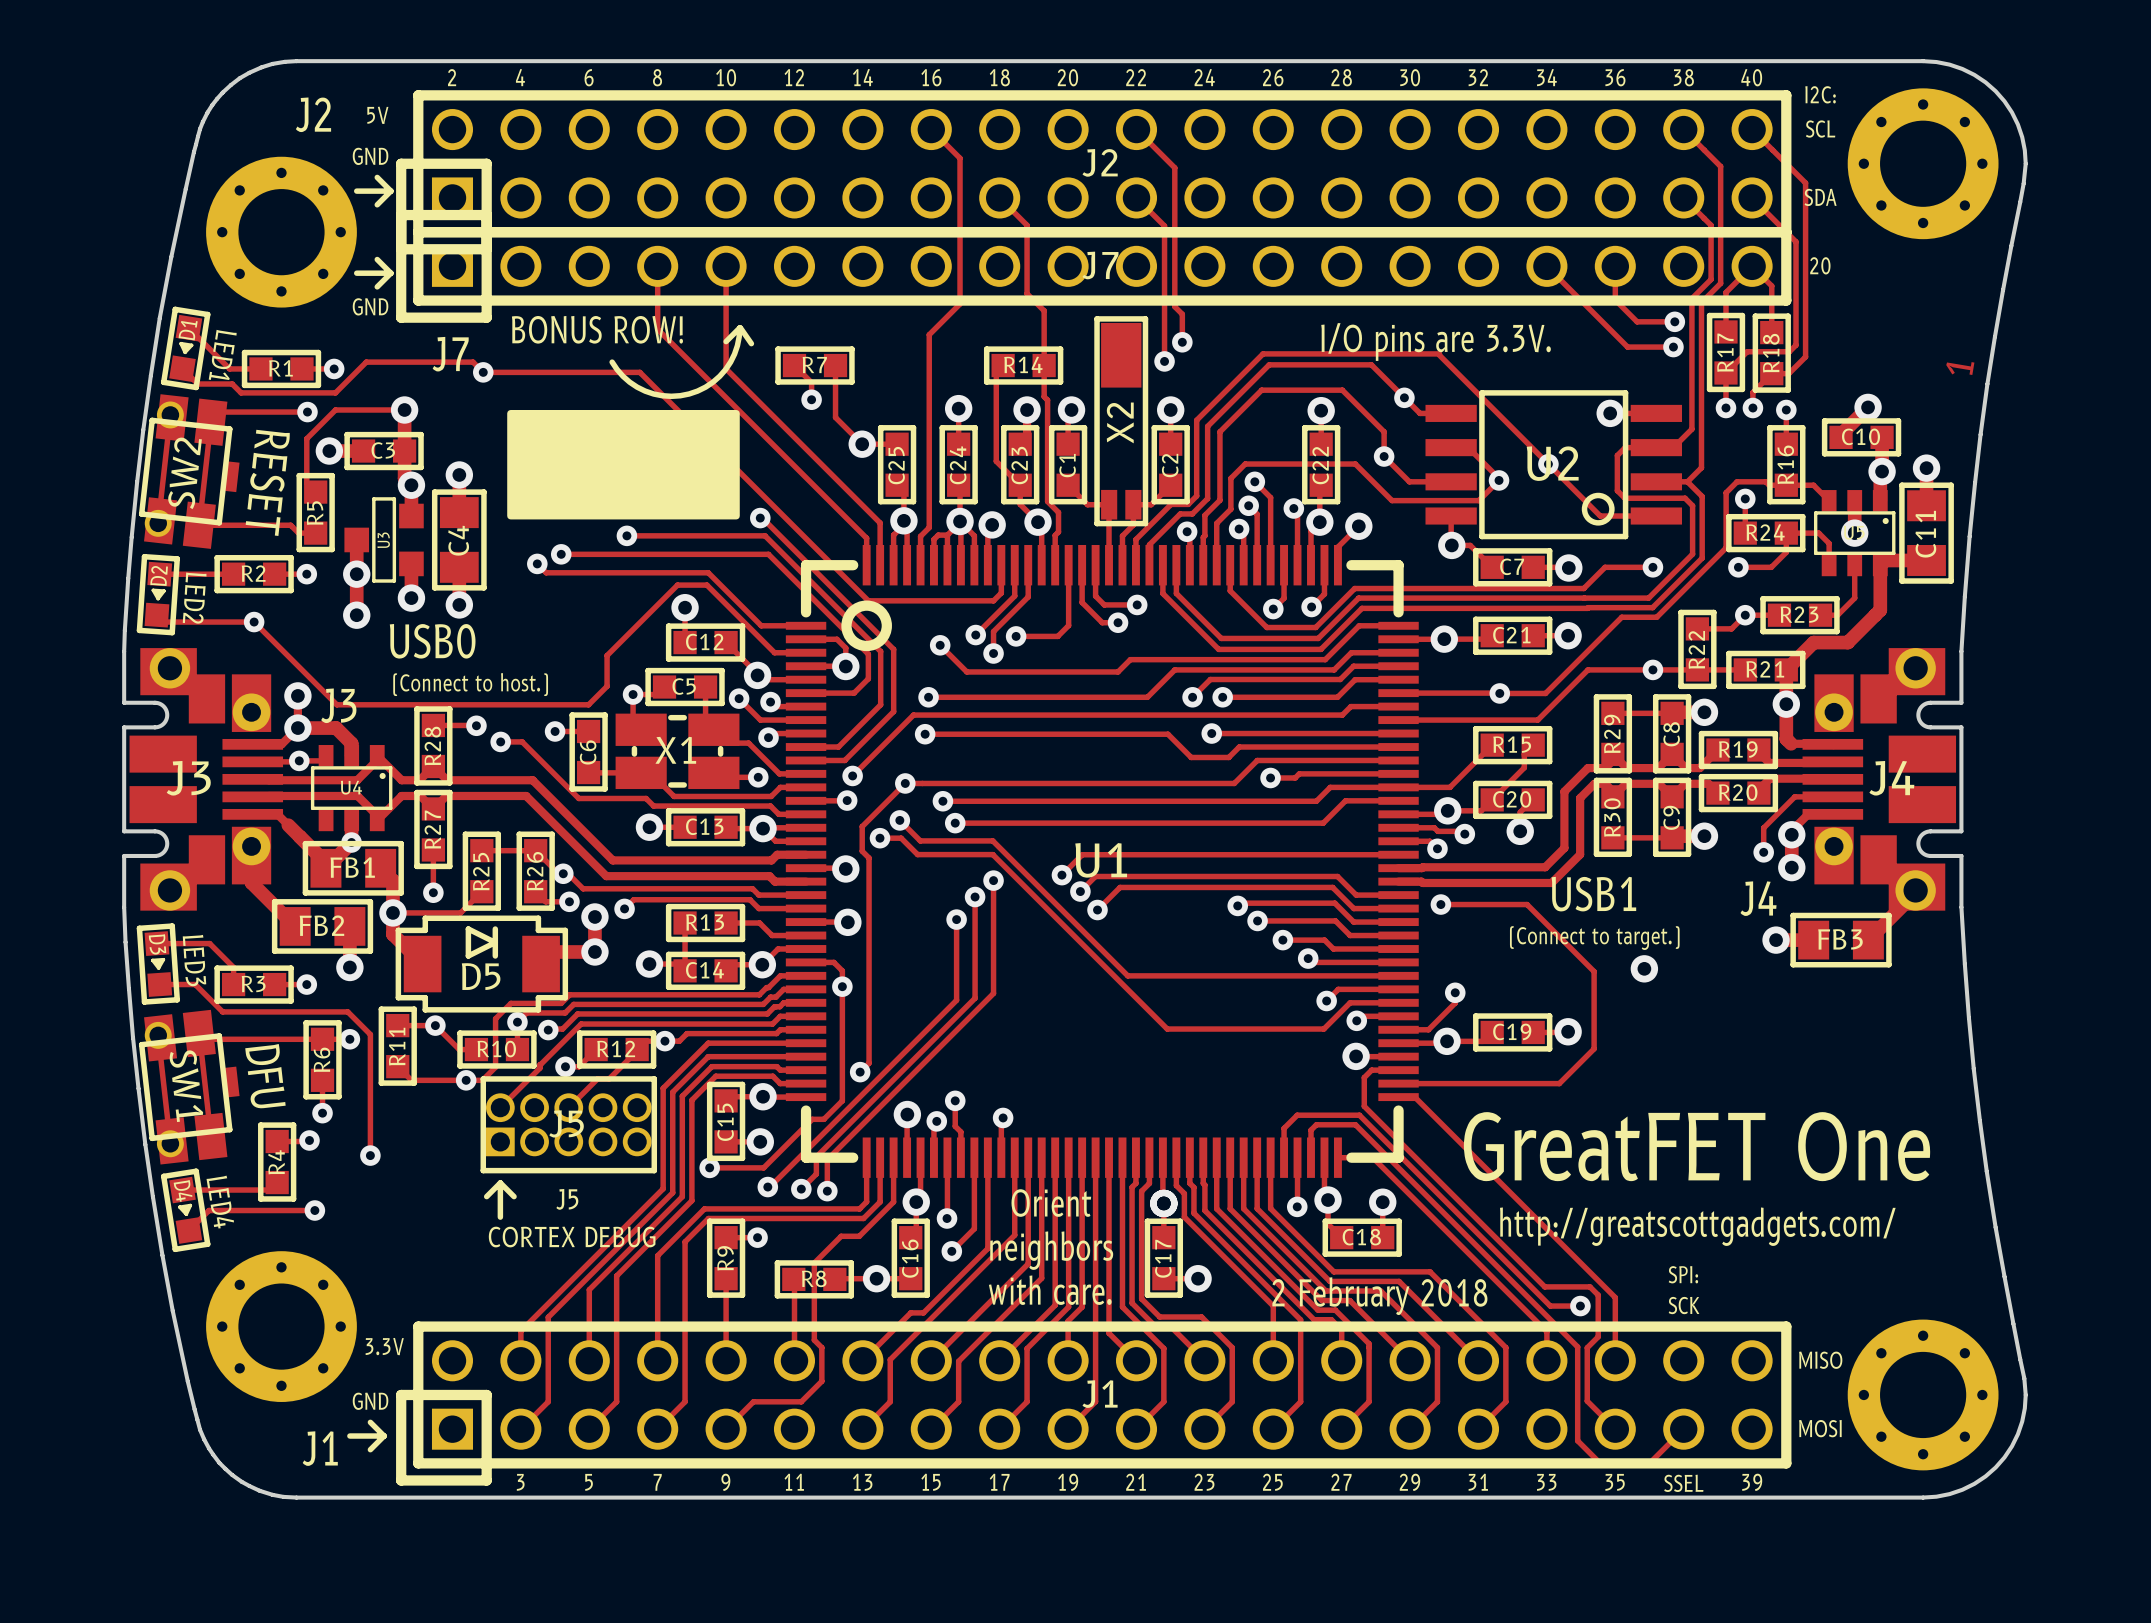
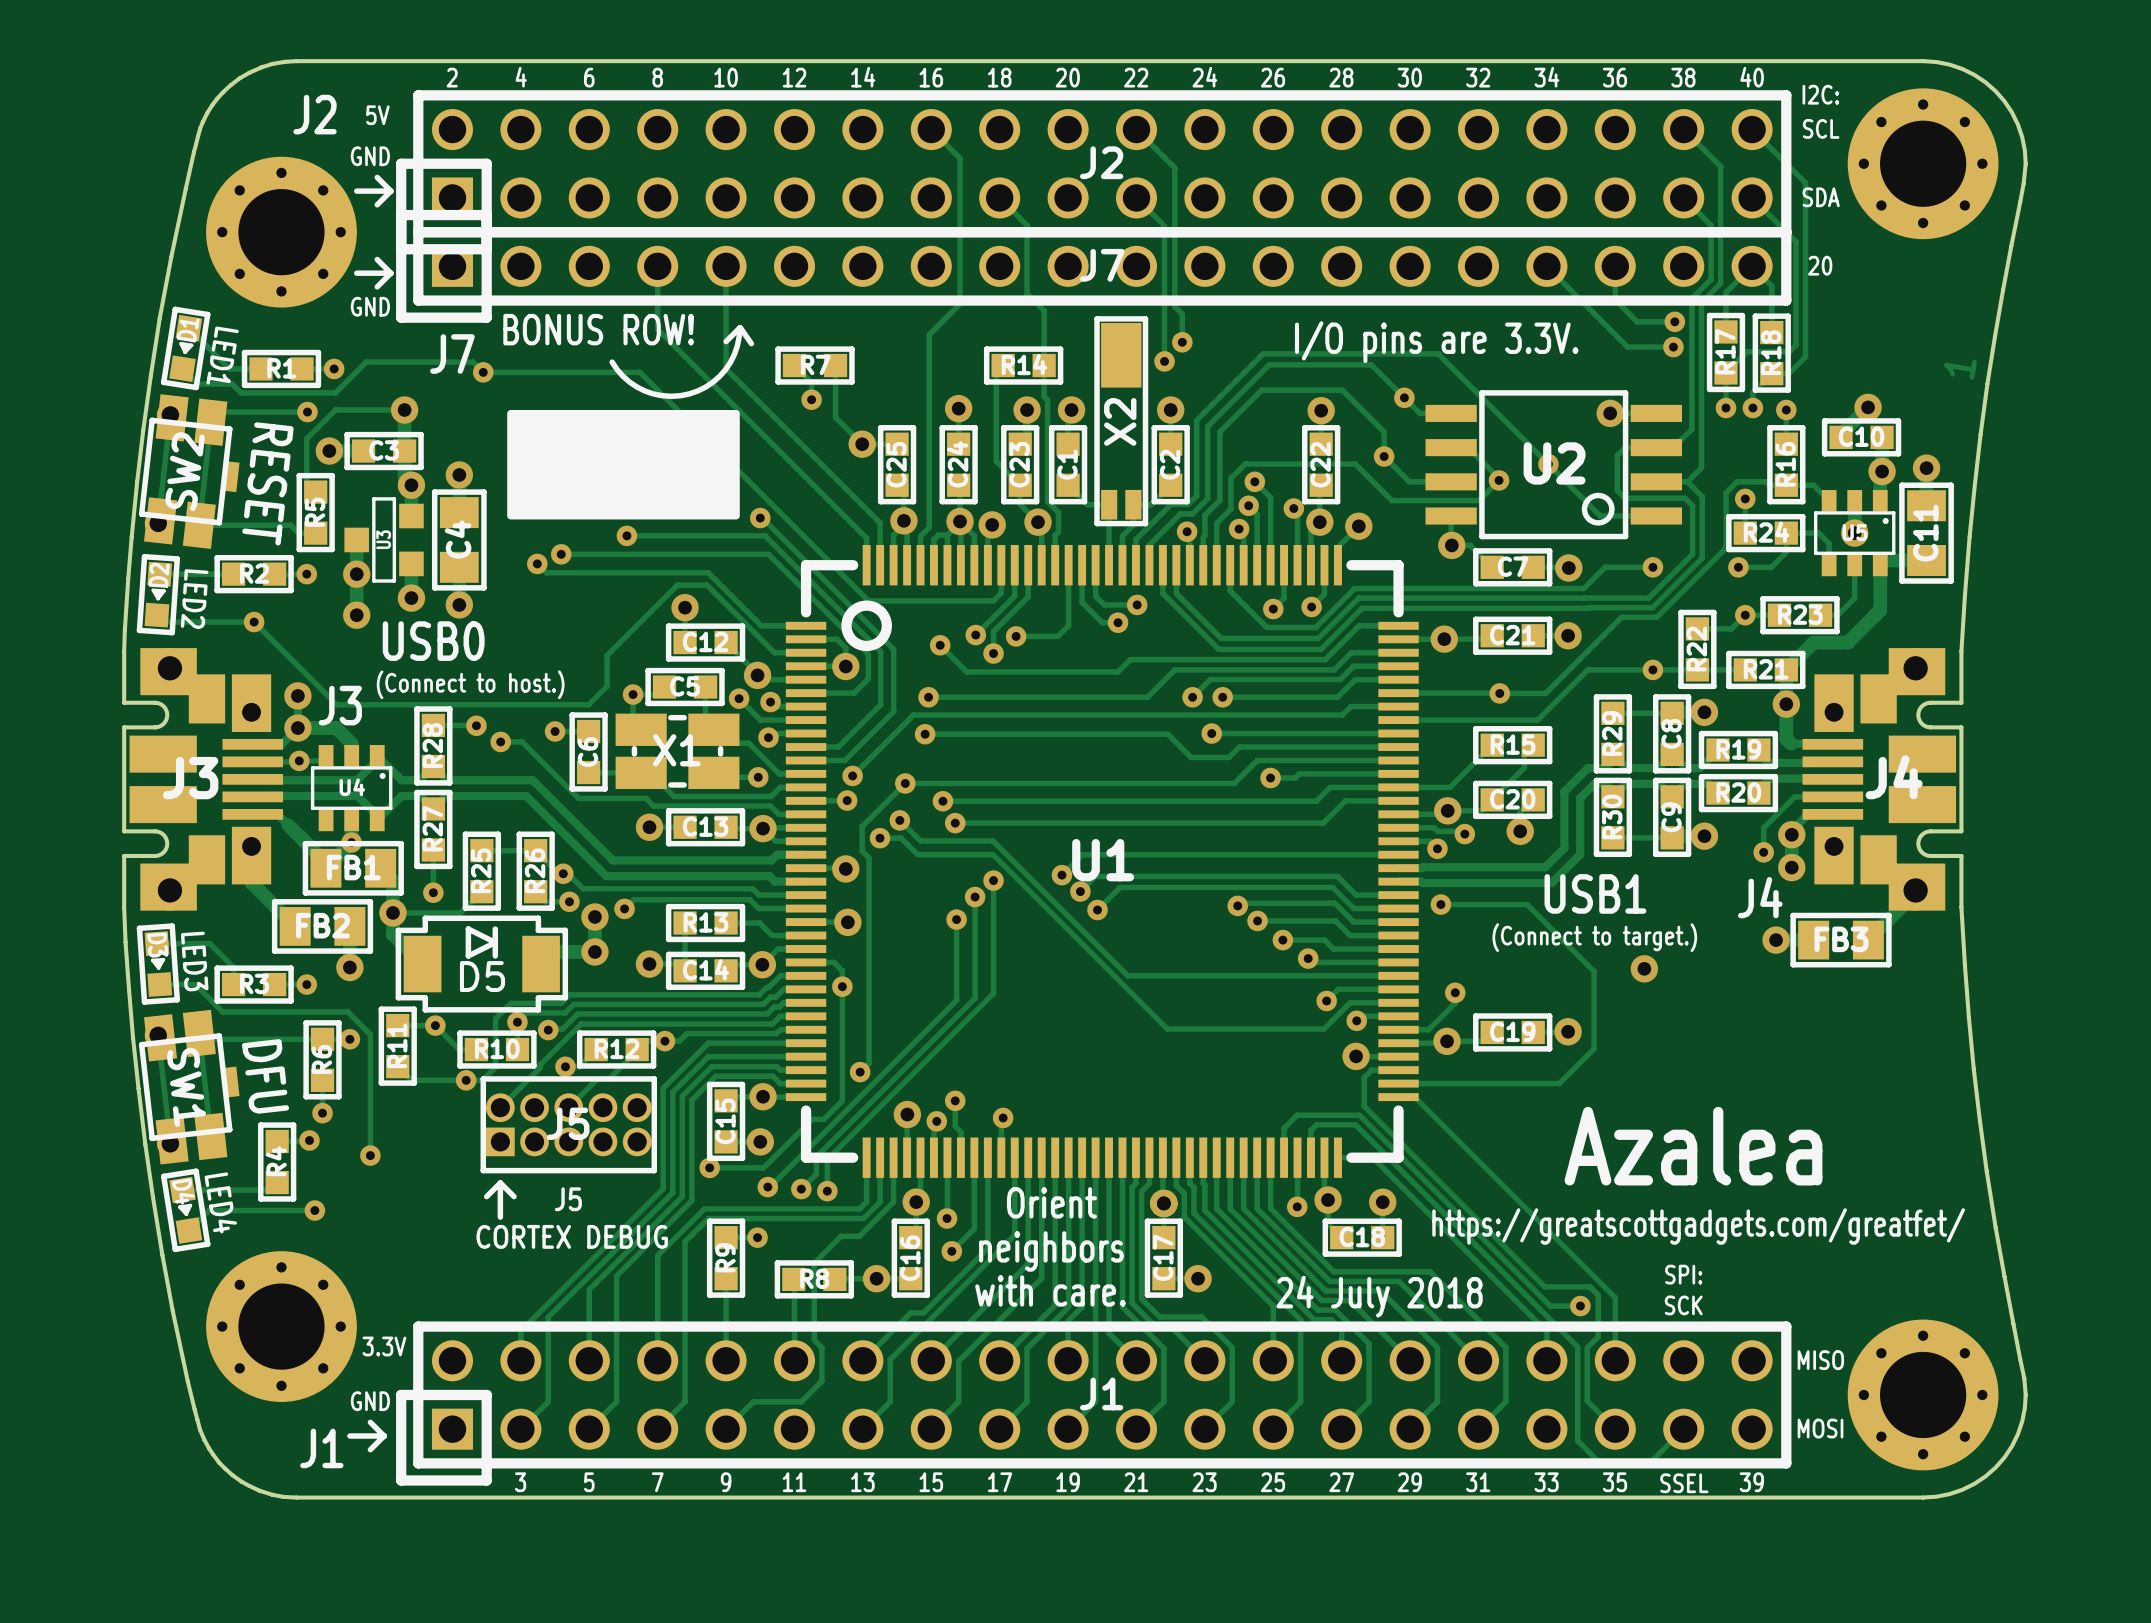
text: GreatFET One (1697, 1146) -> Azalea (1693, 1146)
text: http://greatscottgadgets.com/ (1697, 1226) -> https://greatscottgadgets.com/greatfet/ (1698, 1226)
text: 2 February 2018 (1379, 1296) -> 24 July 2018 (1379, 1296)

